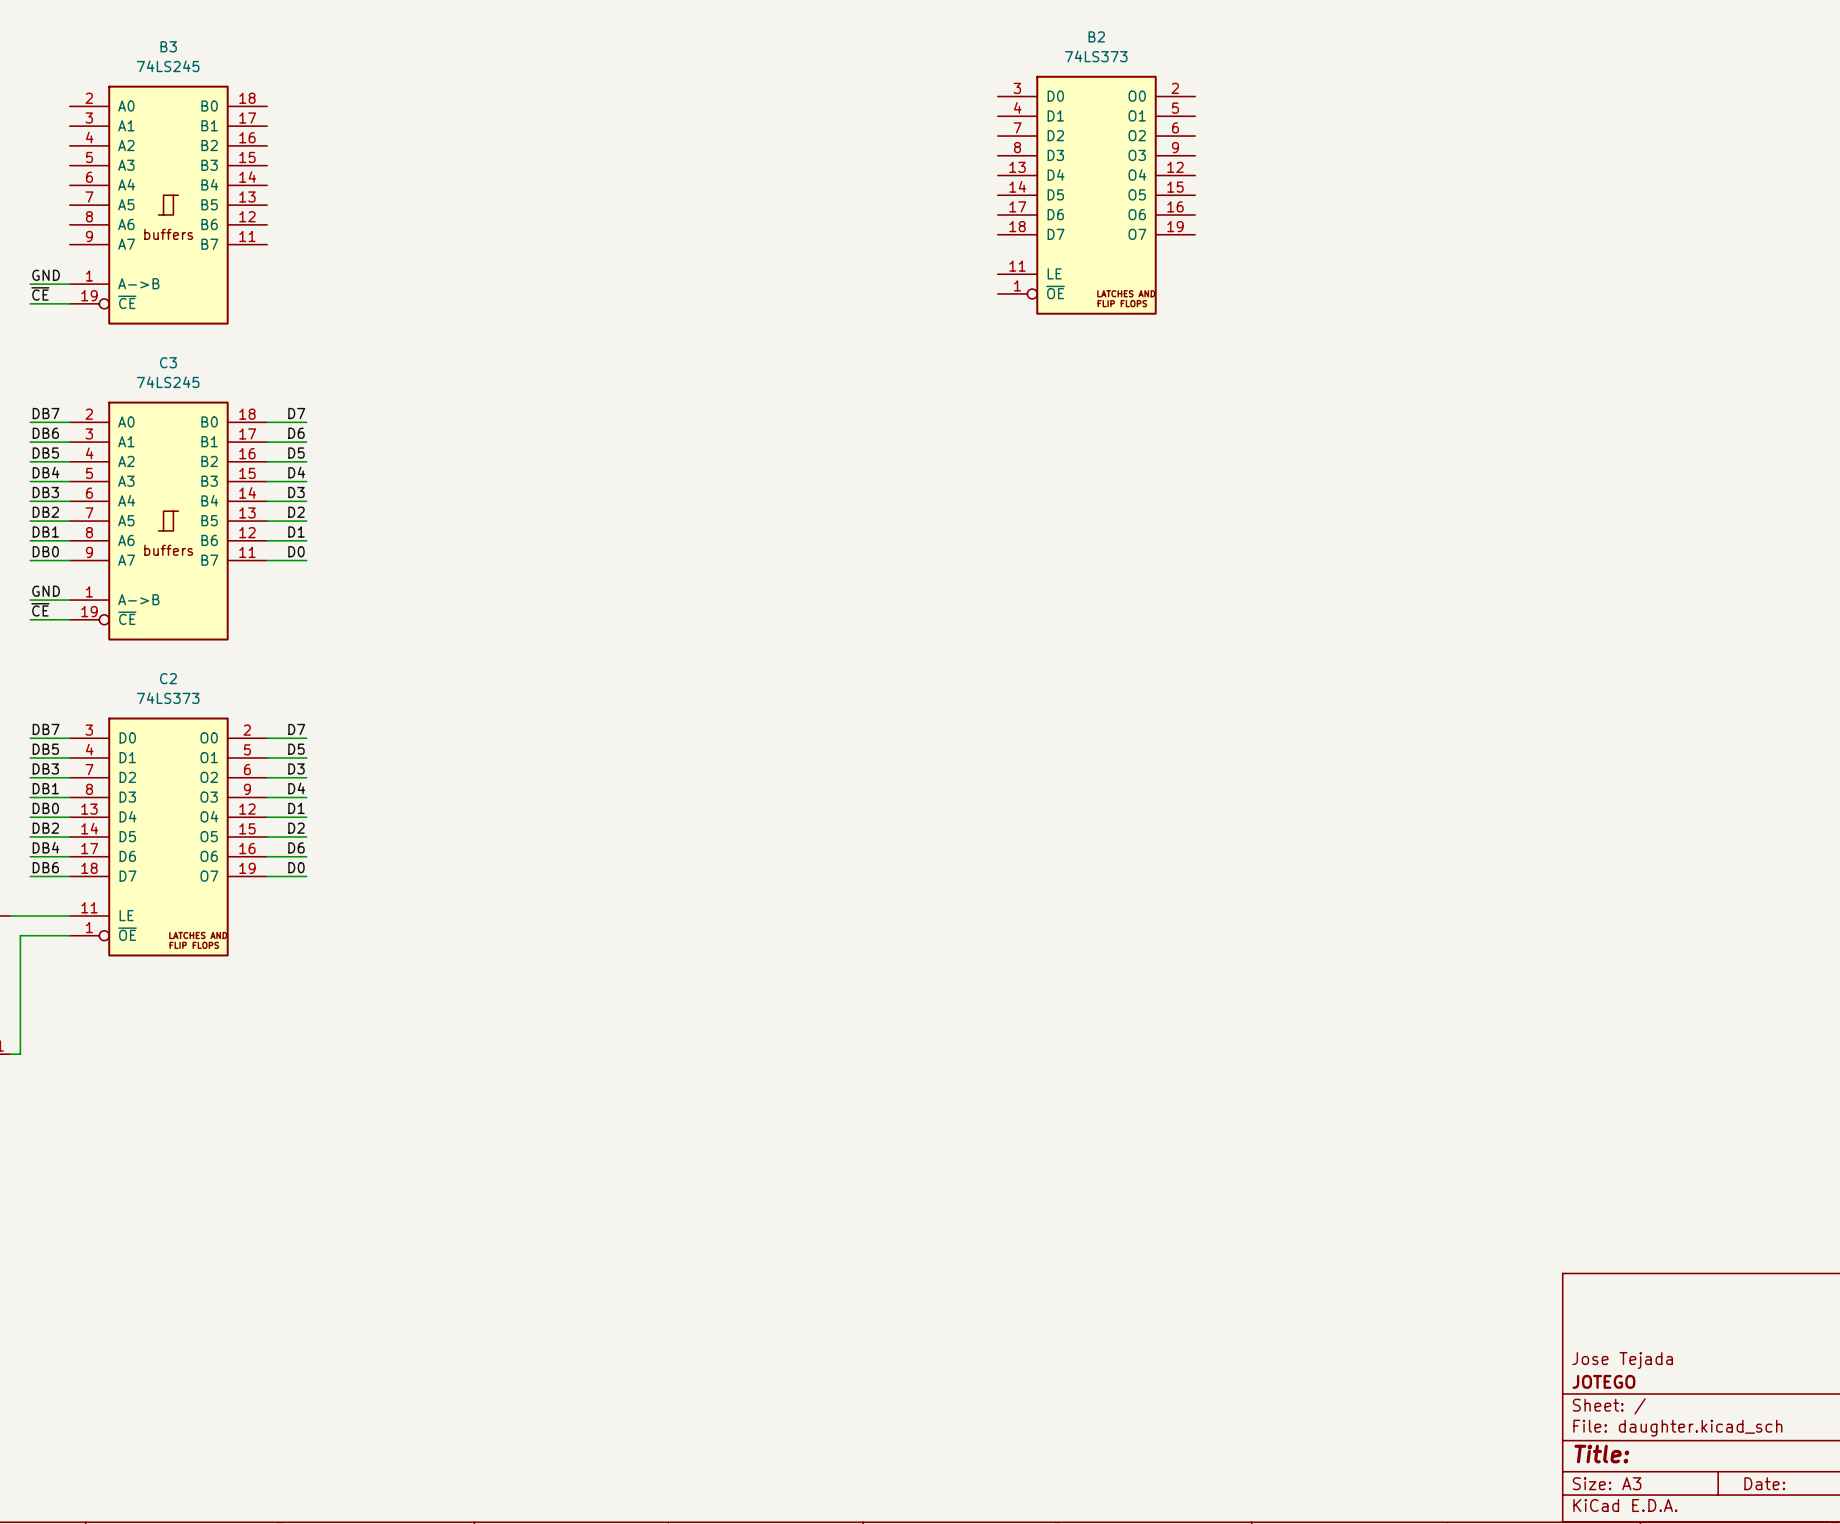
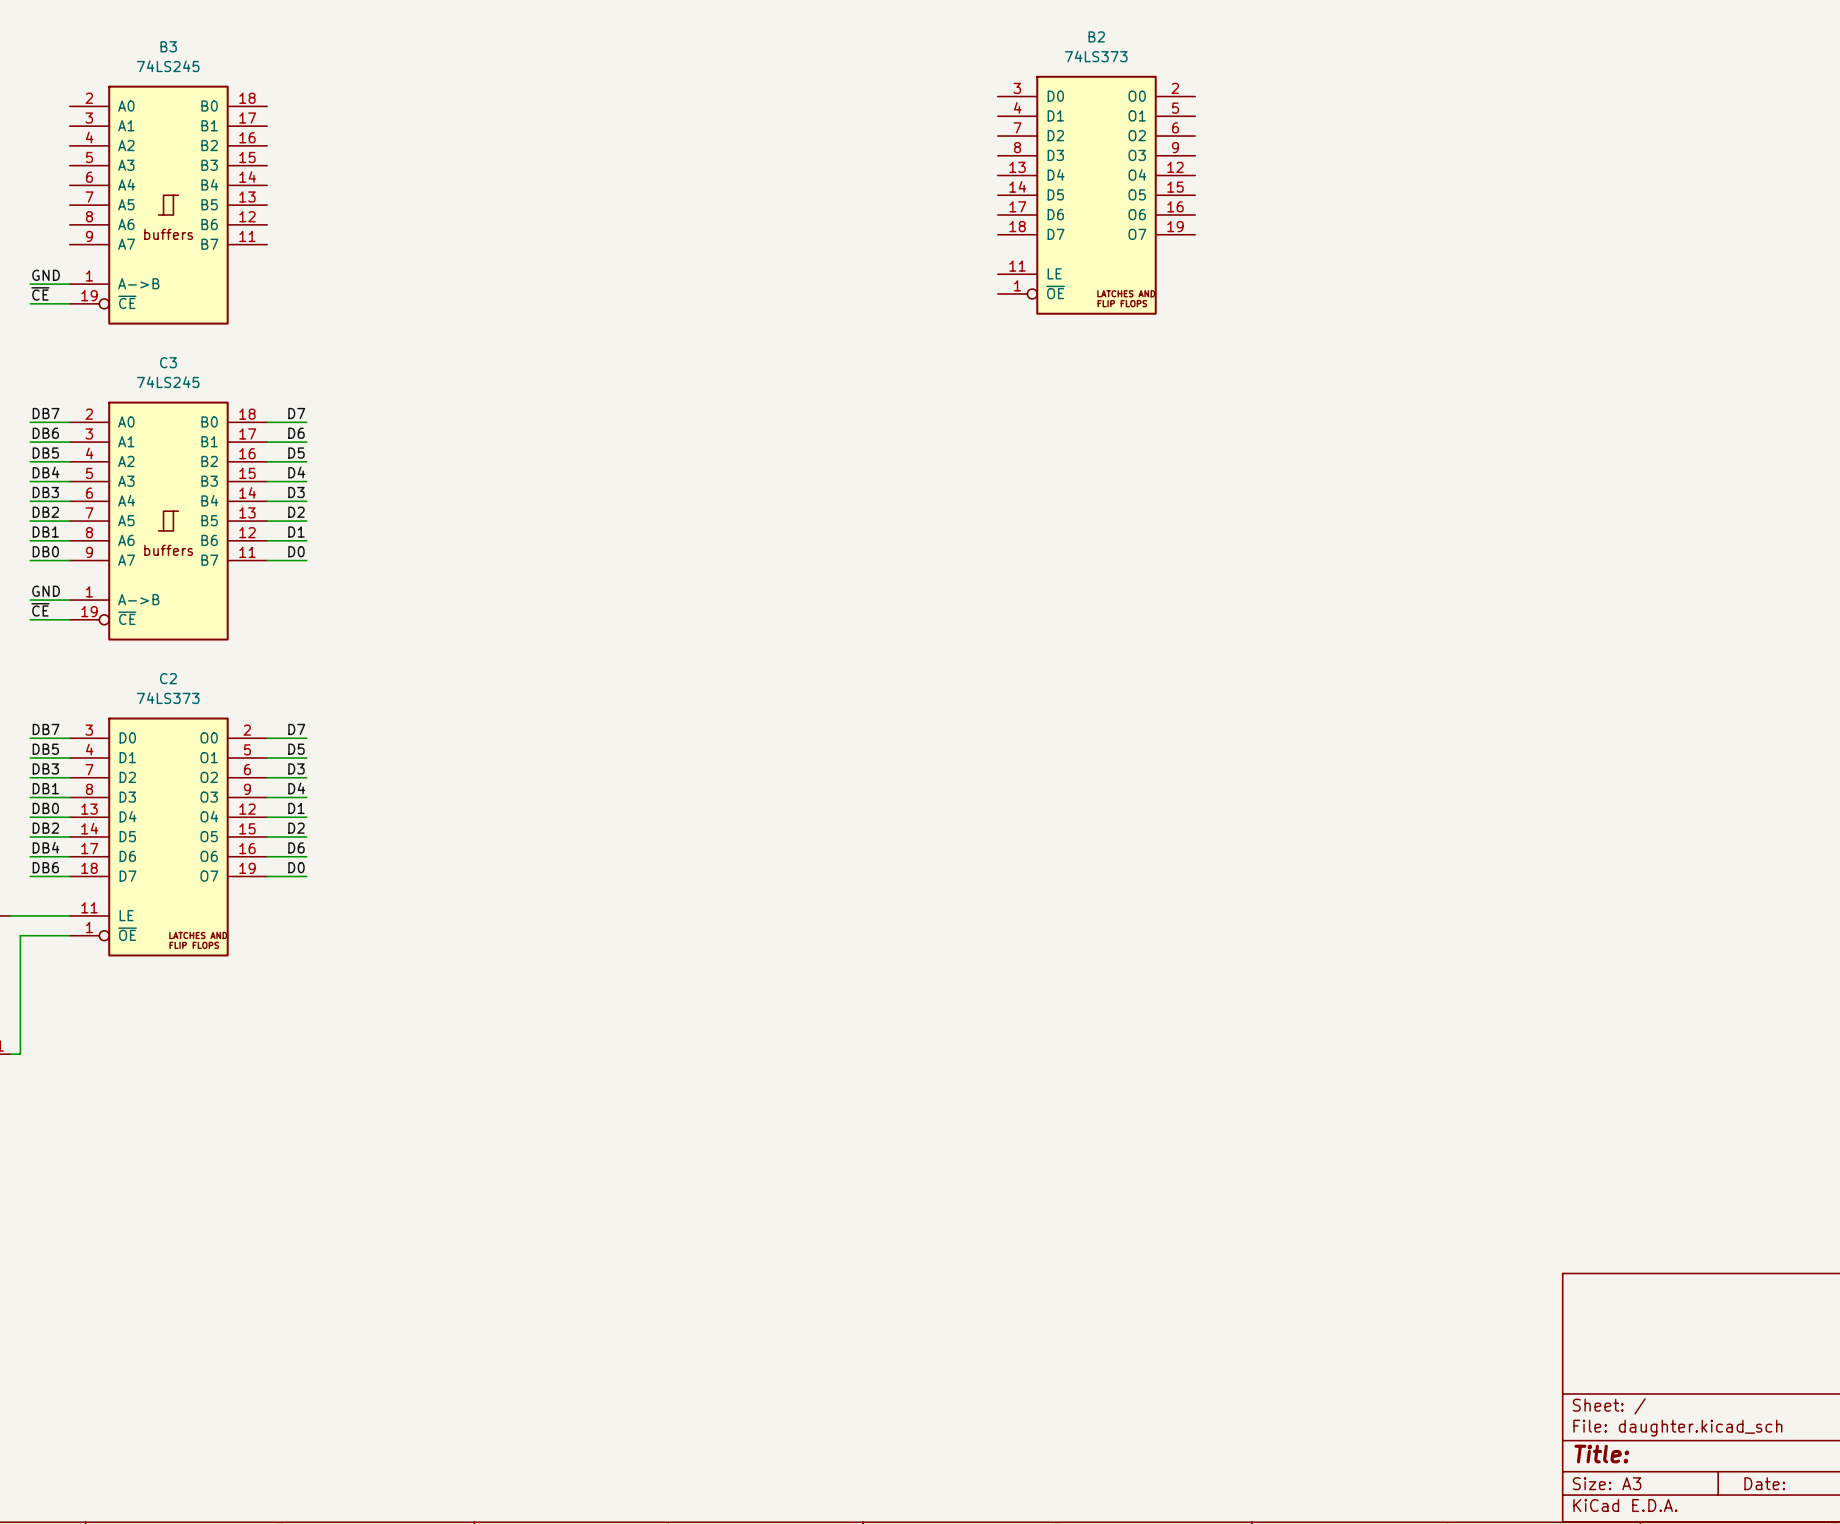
title block: Jose Tejada (1622, 1360) -> none
title block: JOTEGO (1603, 1381) -> none

